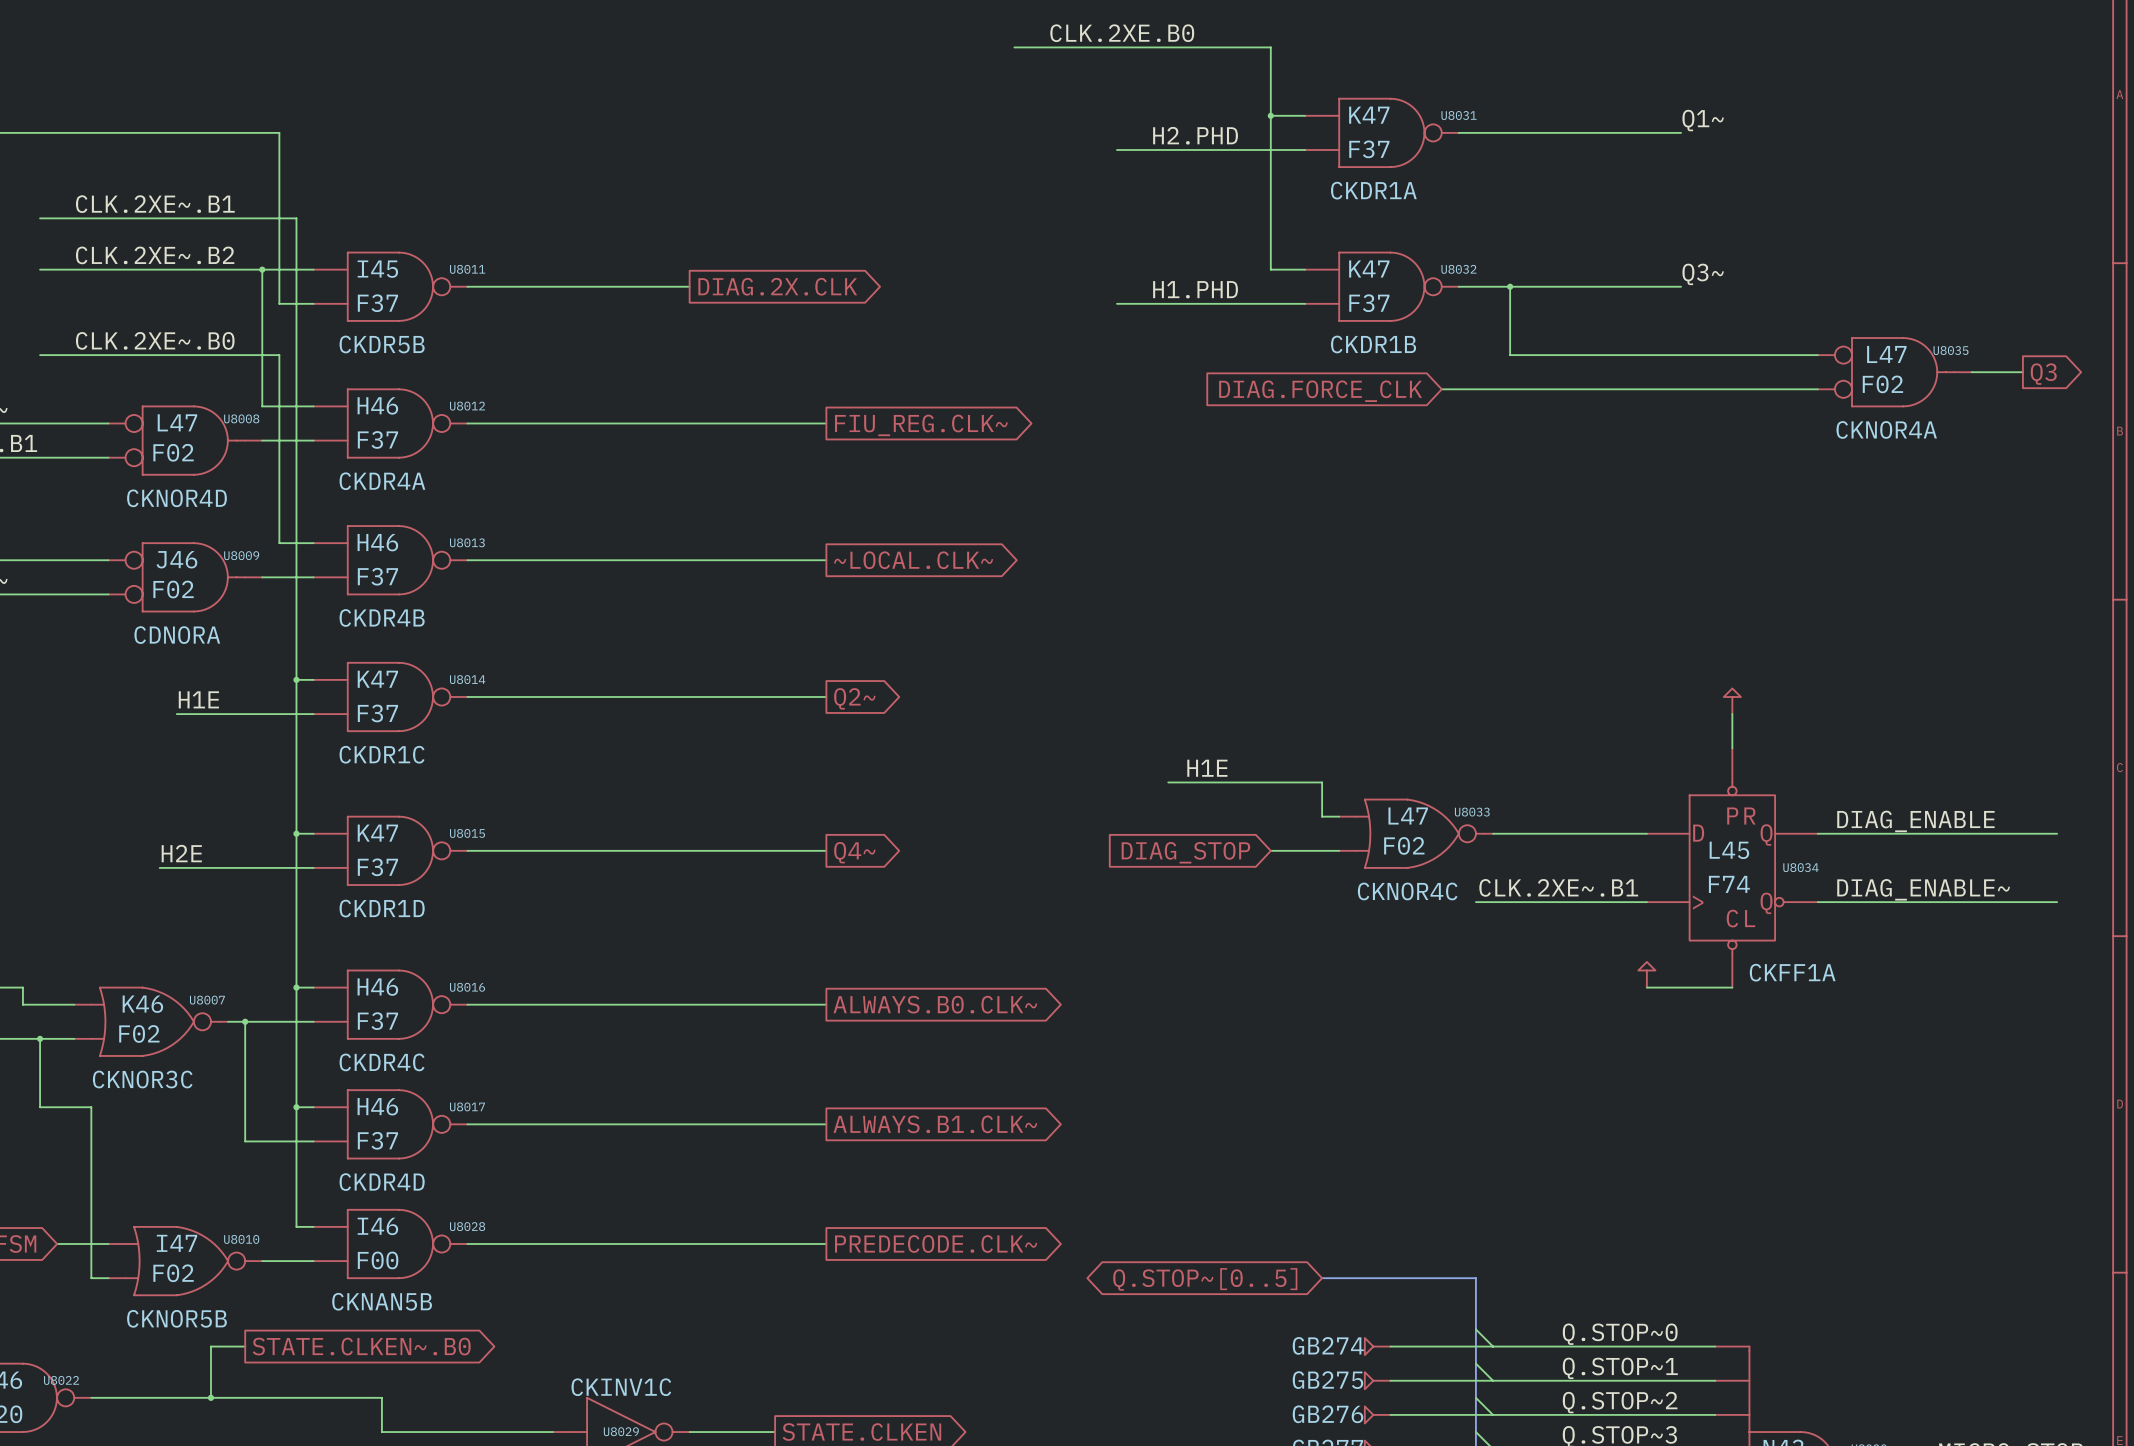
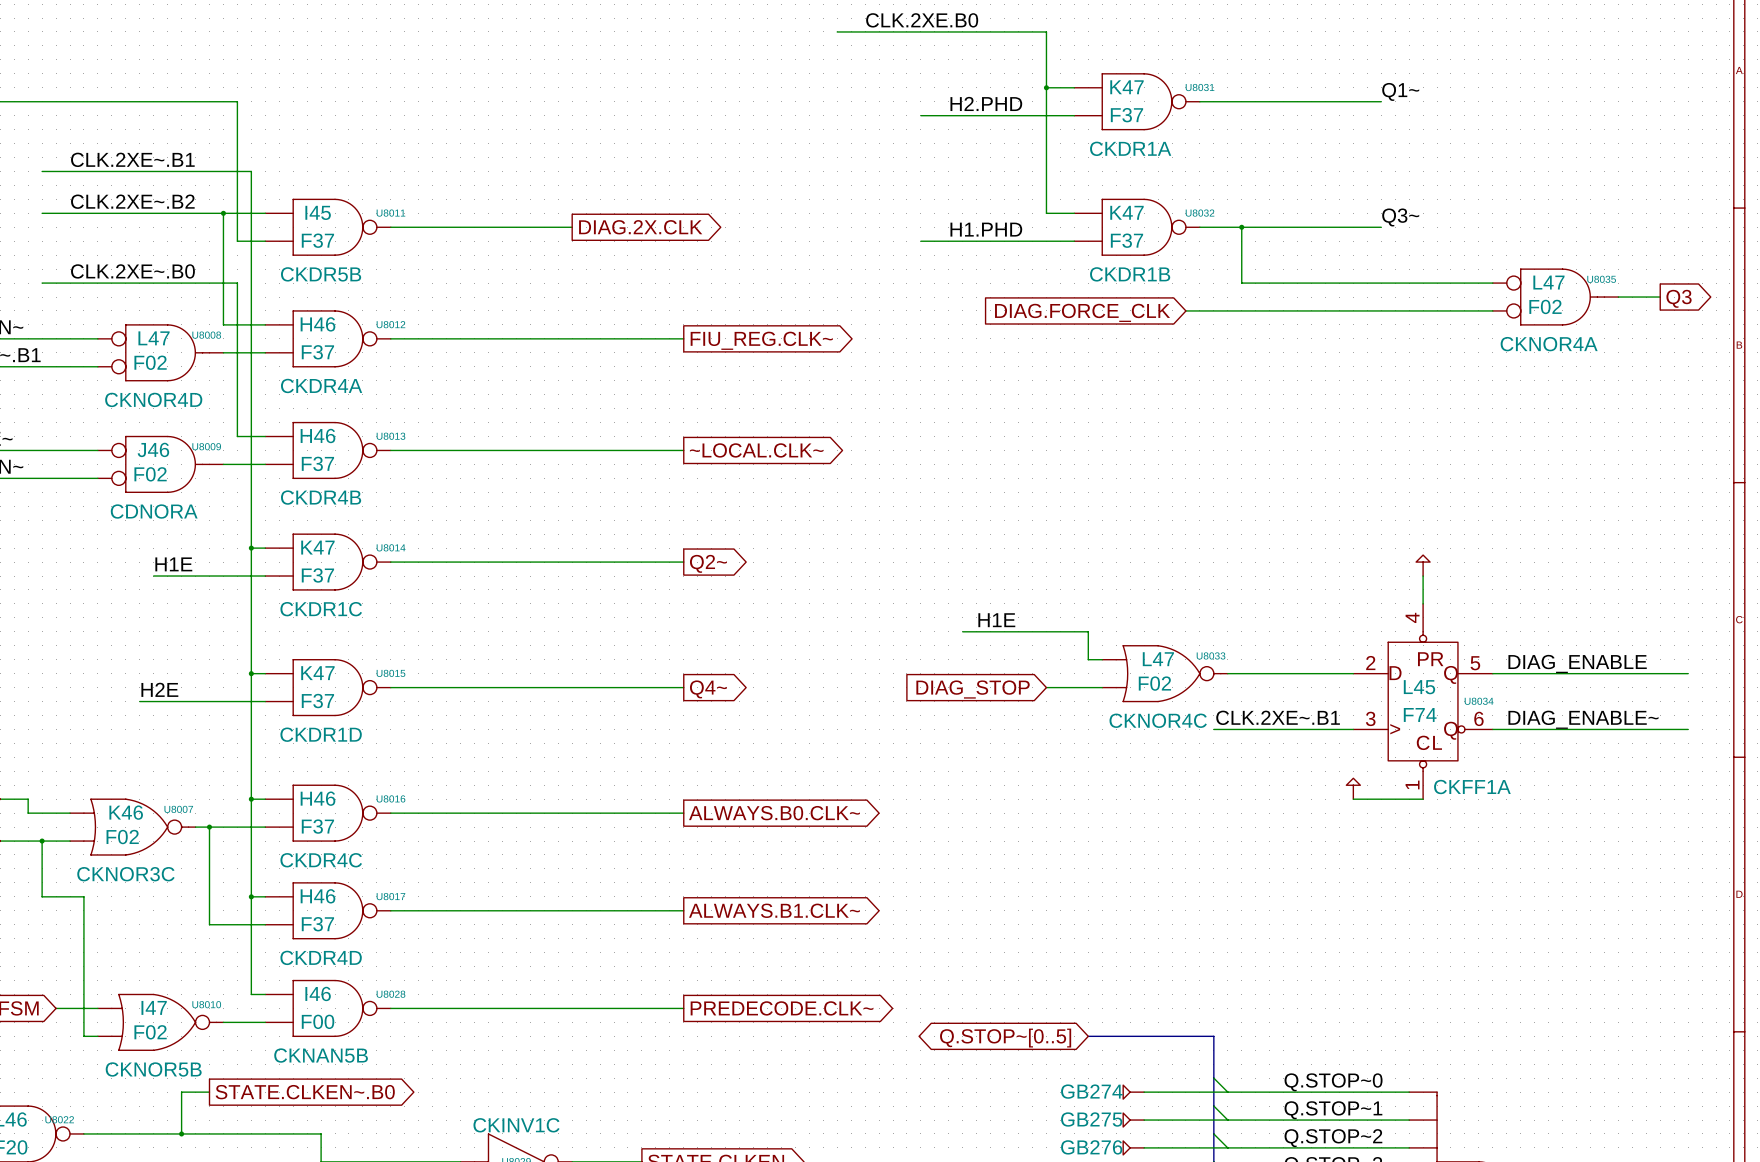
U8034 pin number: none -> 4 (1412, 617)
U8034 pin number: none -> 2 (1370, 663)
U8034 pin number: none -> 5 (1475, 663)
U8034 pin number: none -> 3 (1370, 718)
U8034 pin number: none -> 6 (1478, 718)
U8034 pin number: none -> 1 (1412, 784)

